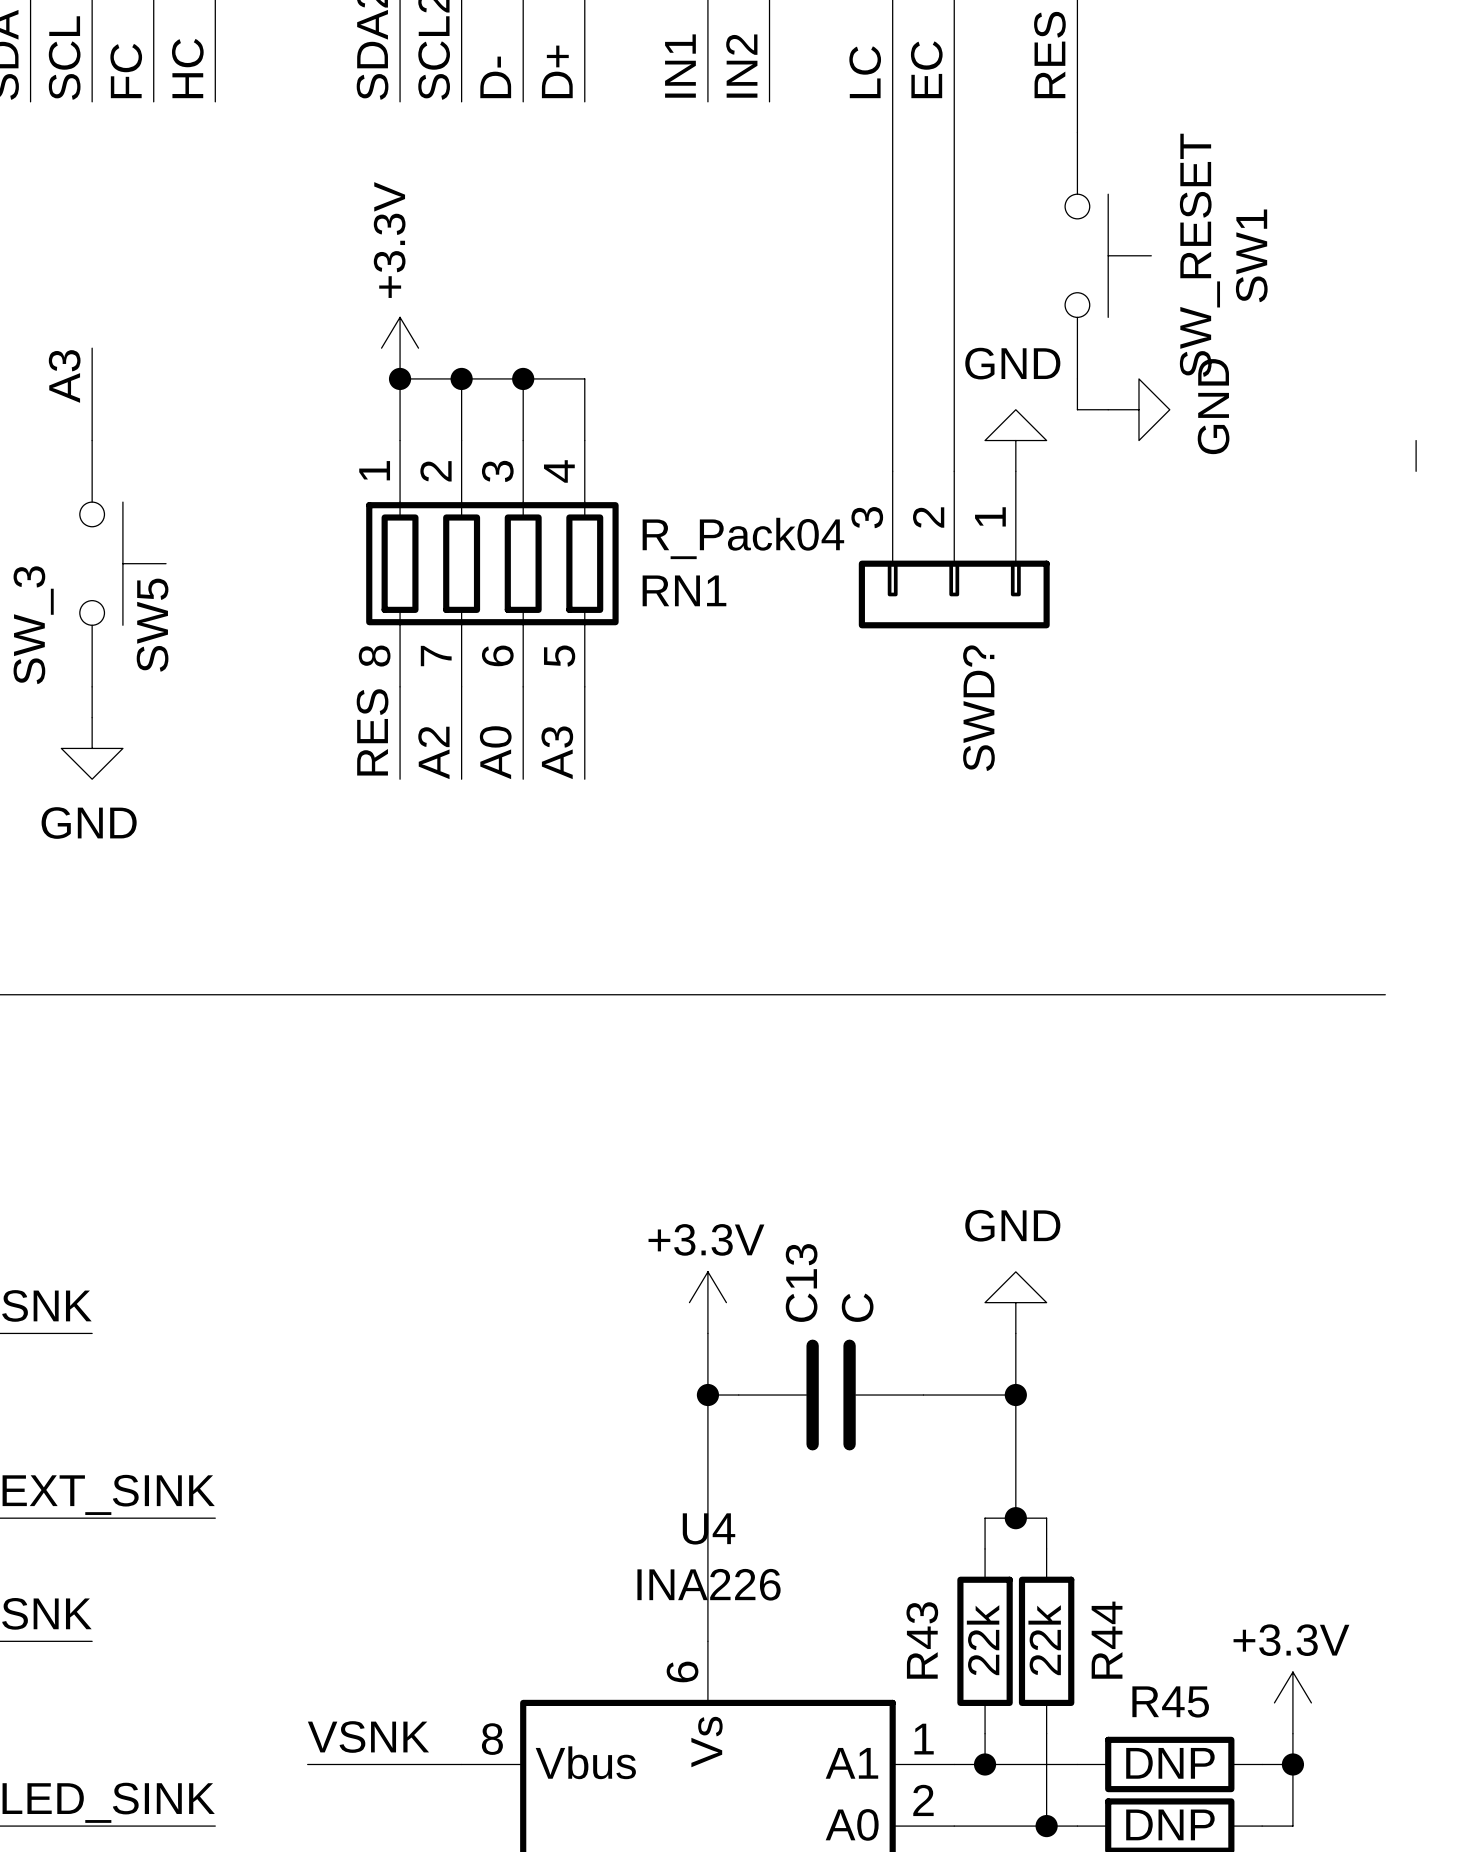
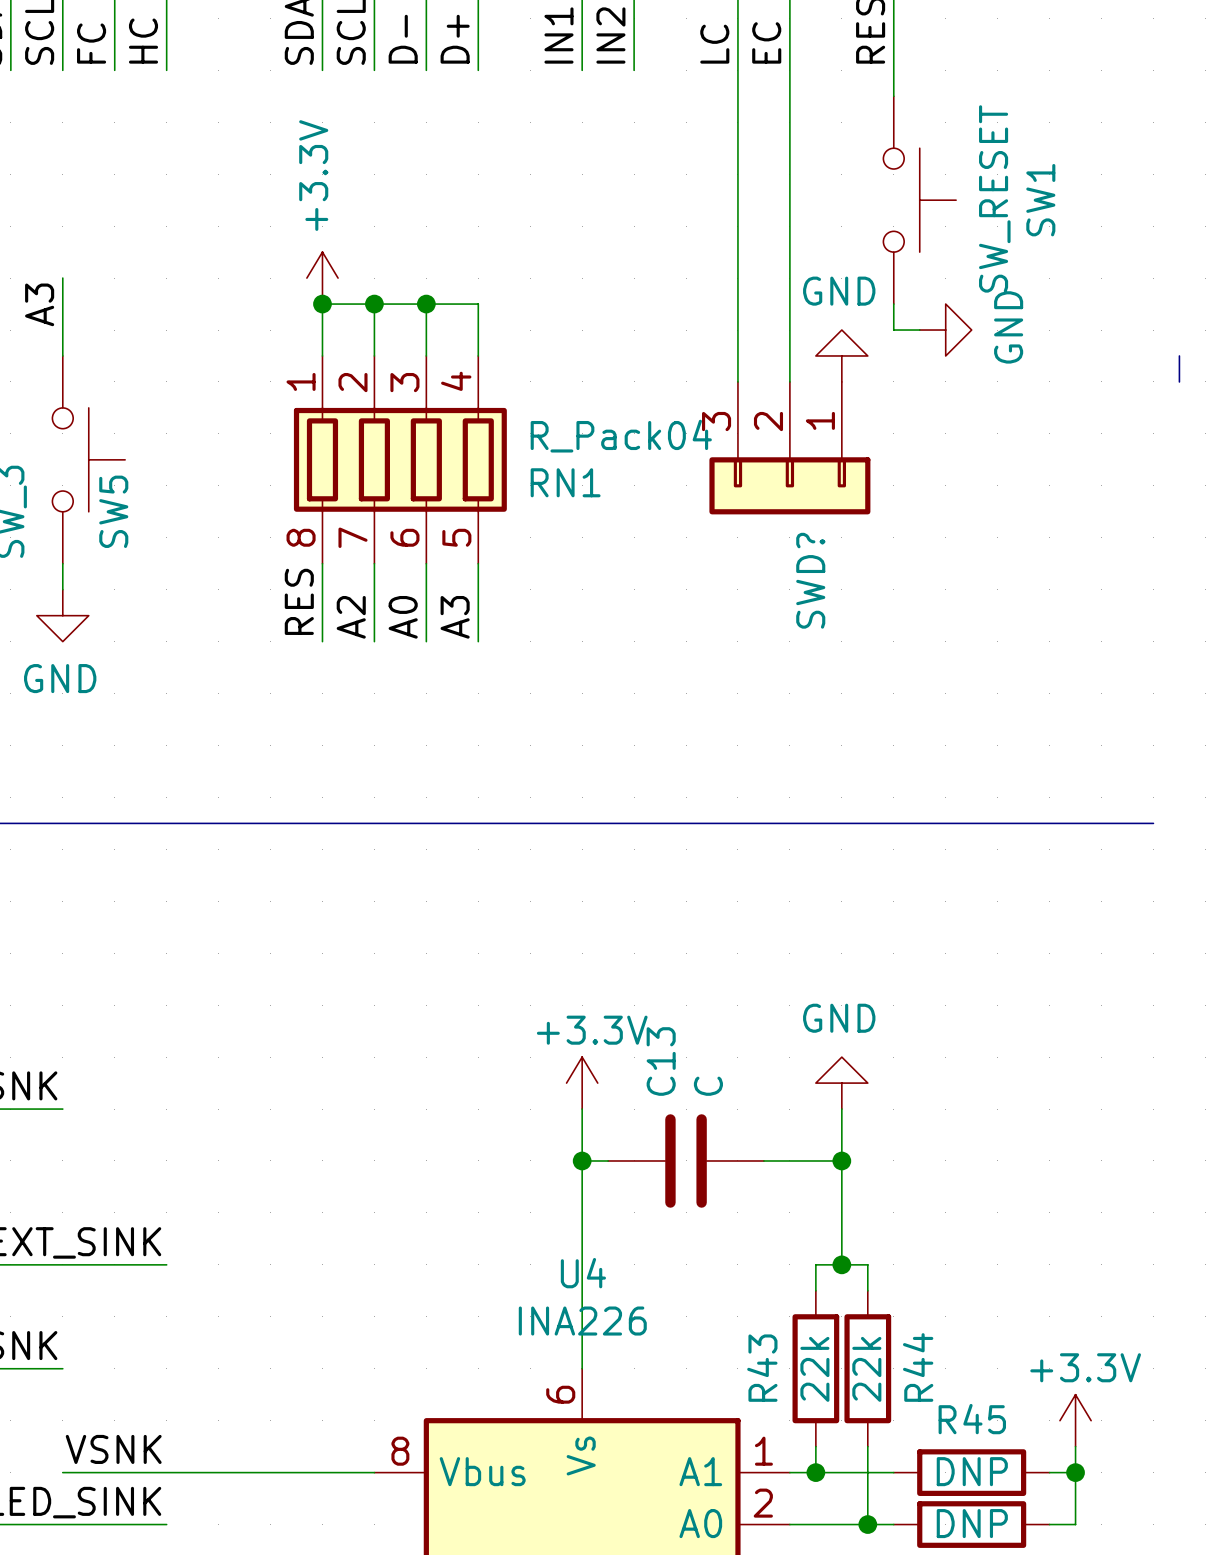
label position: VSNK (368, 1737) -> VSNK (113, 1449)
wire: none -> (62, 1472) (244, 1472)

